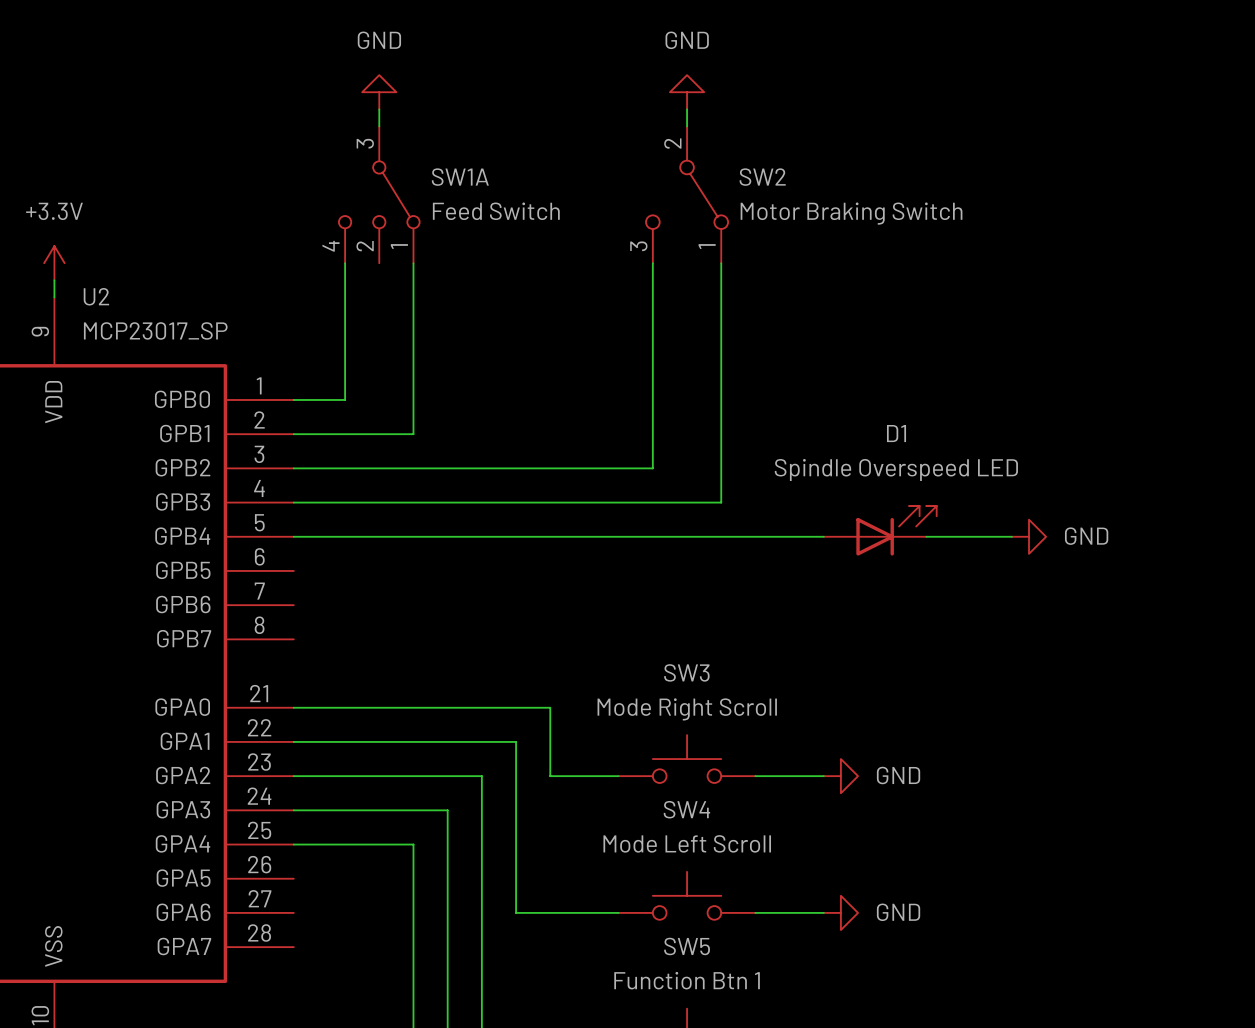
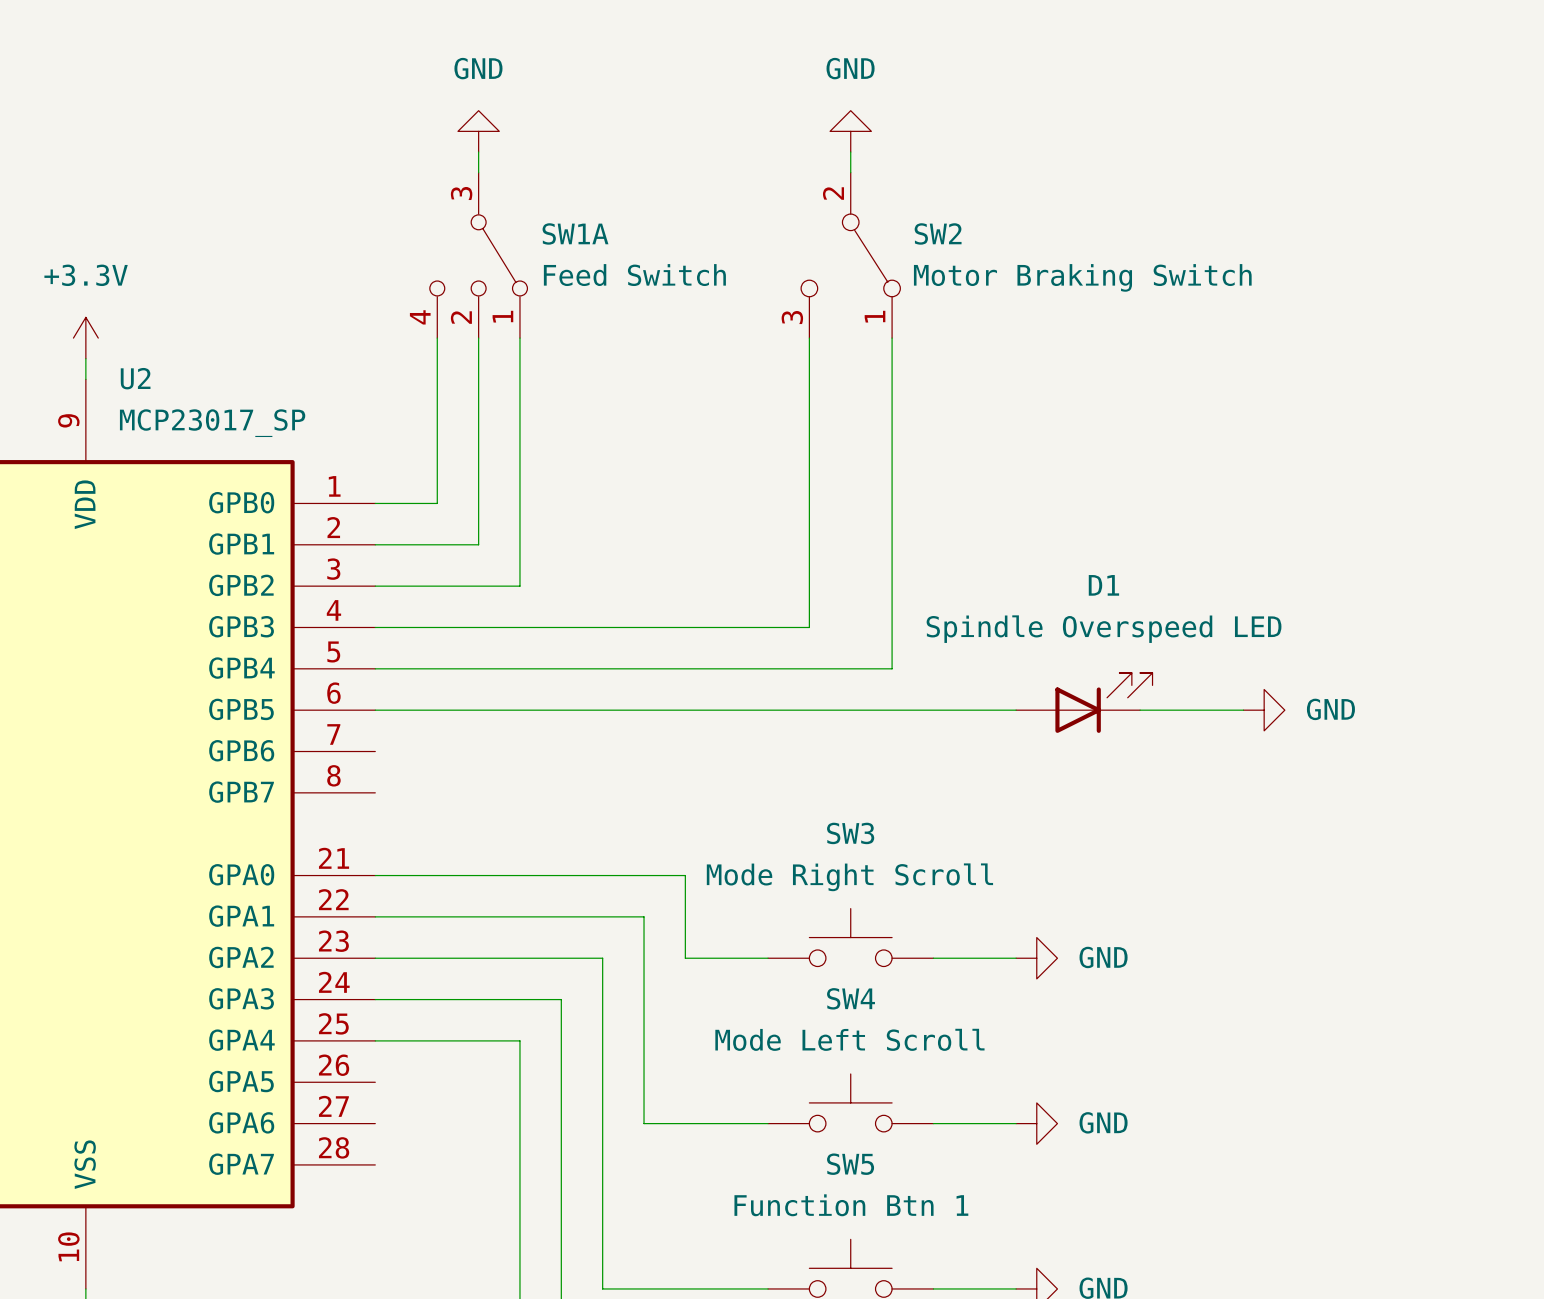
wire: none -> (478, 338) (478, 544)
wire: (379, 434) (413, 434) -> (519, 586) (519, 544)
wire: (413, 468) (652, 468) -> none
wire: (652, 502) (721, 502) -> (809, 627) (809, 586)
D1 position: (880, 530) -> (1084, 702)
wire: (721, 536) (823, 536) -> (892, 668) (892, 627)
wire: (926, 536) (1011, 536) -> (1140, 710) (1243, 710)
power symbol position: GND (1029, 536) -> GND (1264, 710)
wire: none -> (375, 710) (1016, 710)

